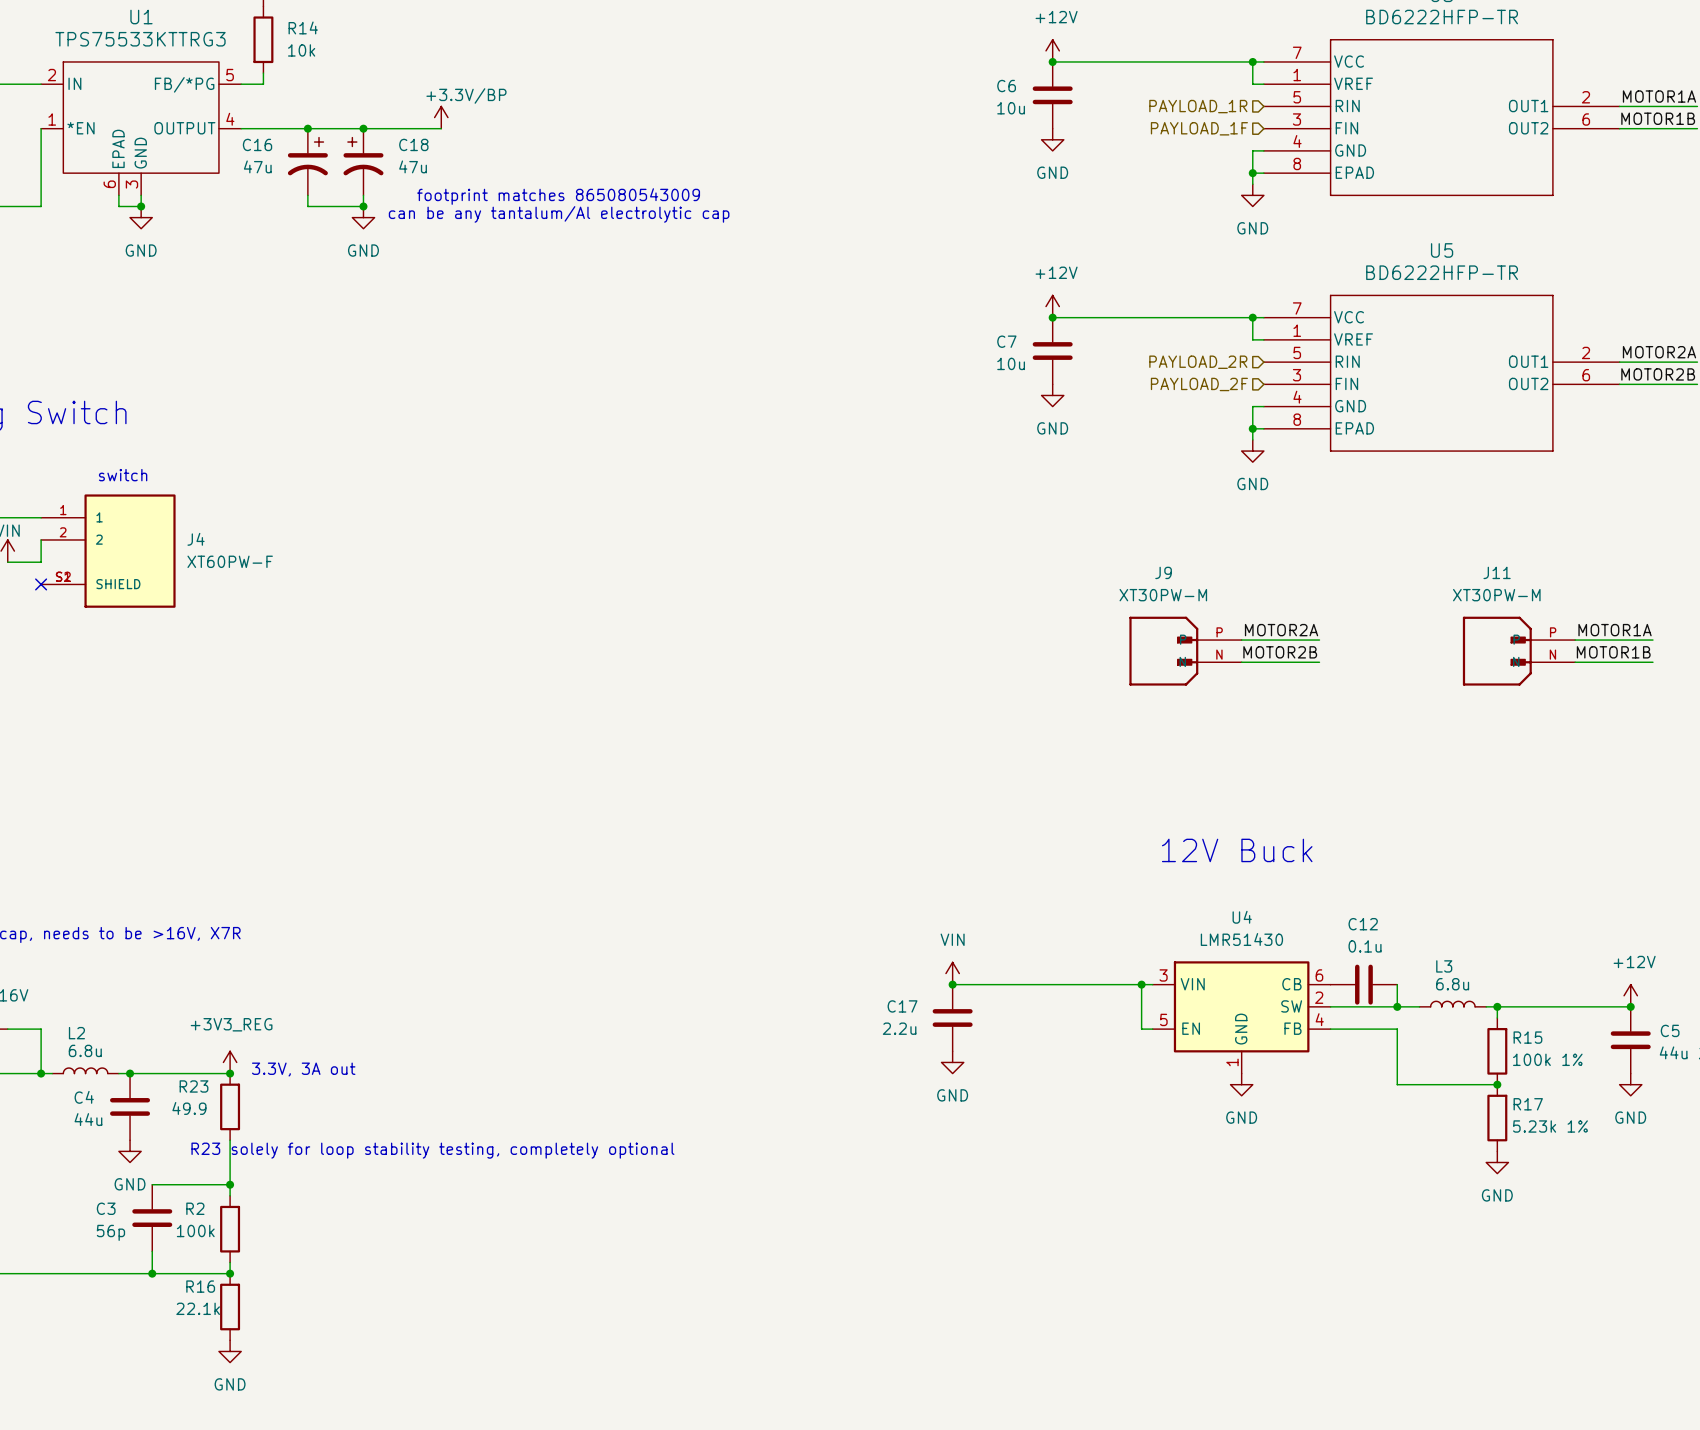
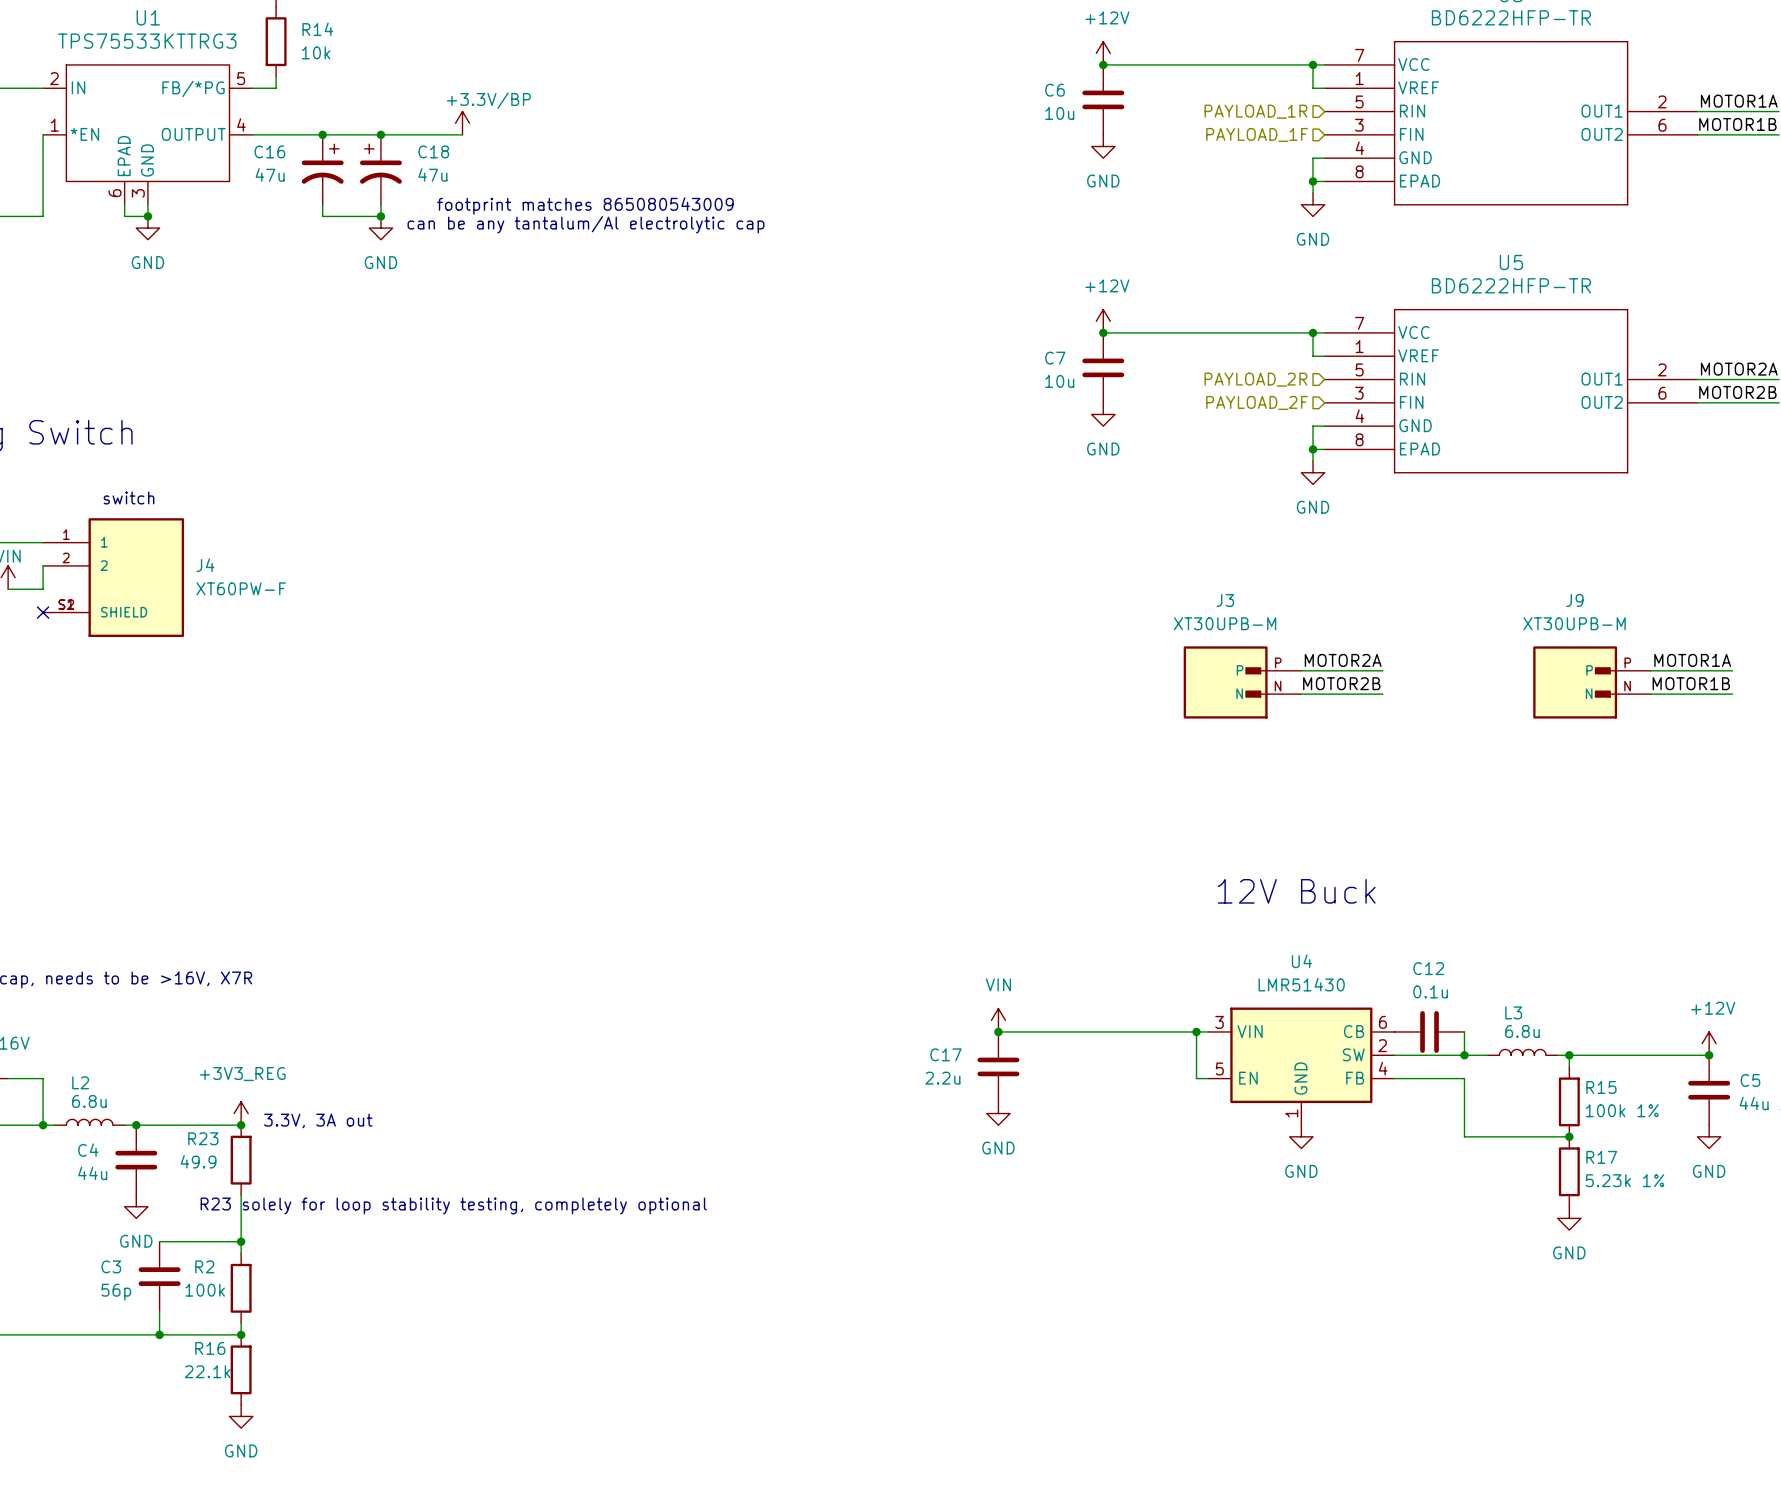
J9 value: XT30PW-M (1163, 595) -> XT30UPB-M (1574, 623)
J9 symbol: [1129, 616, 1242, 686] -> [1533, 646, 1651, 719]
J3: none -> XT30UPB-M (1242, 682)
J11: XT30PW-M (1519, 651) -> none

